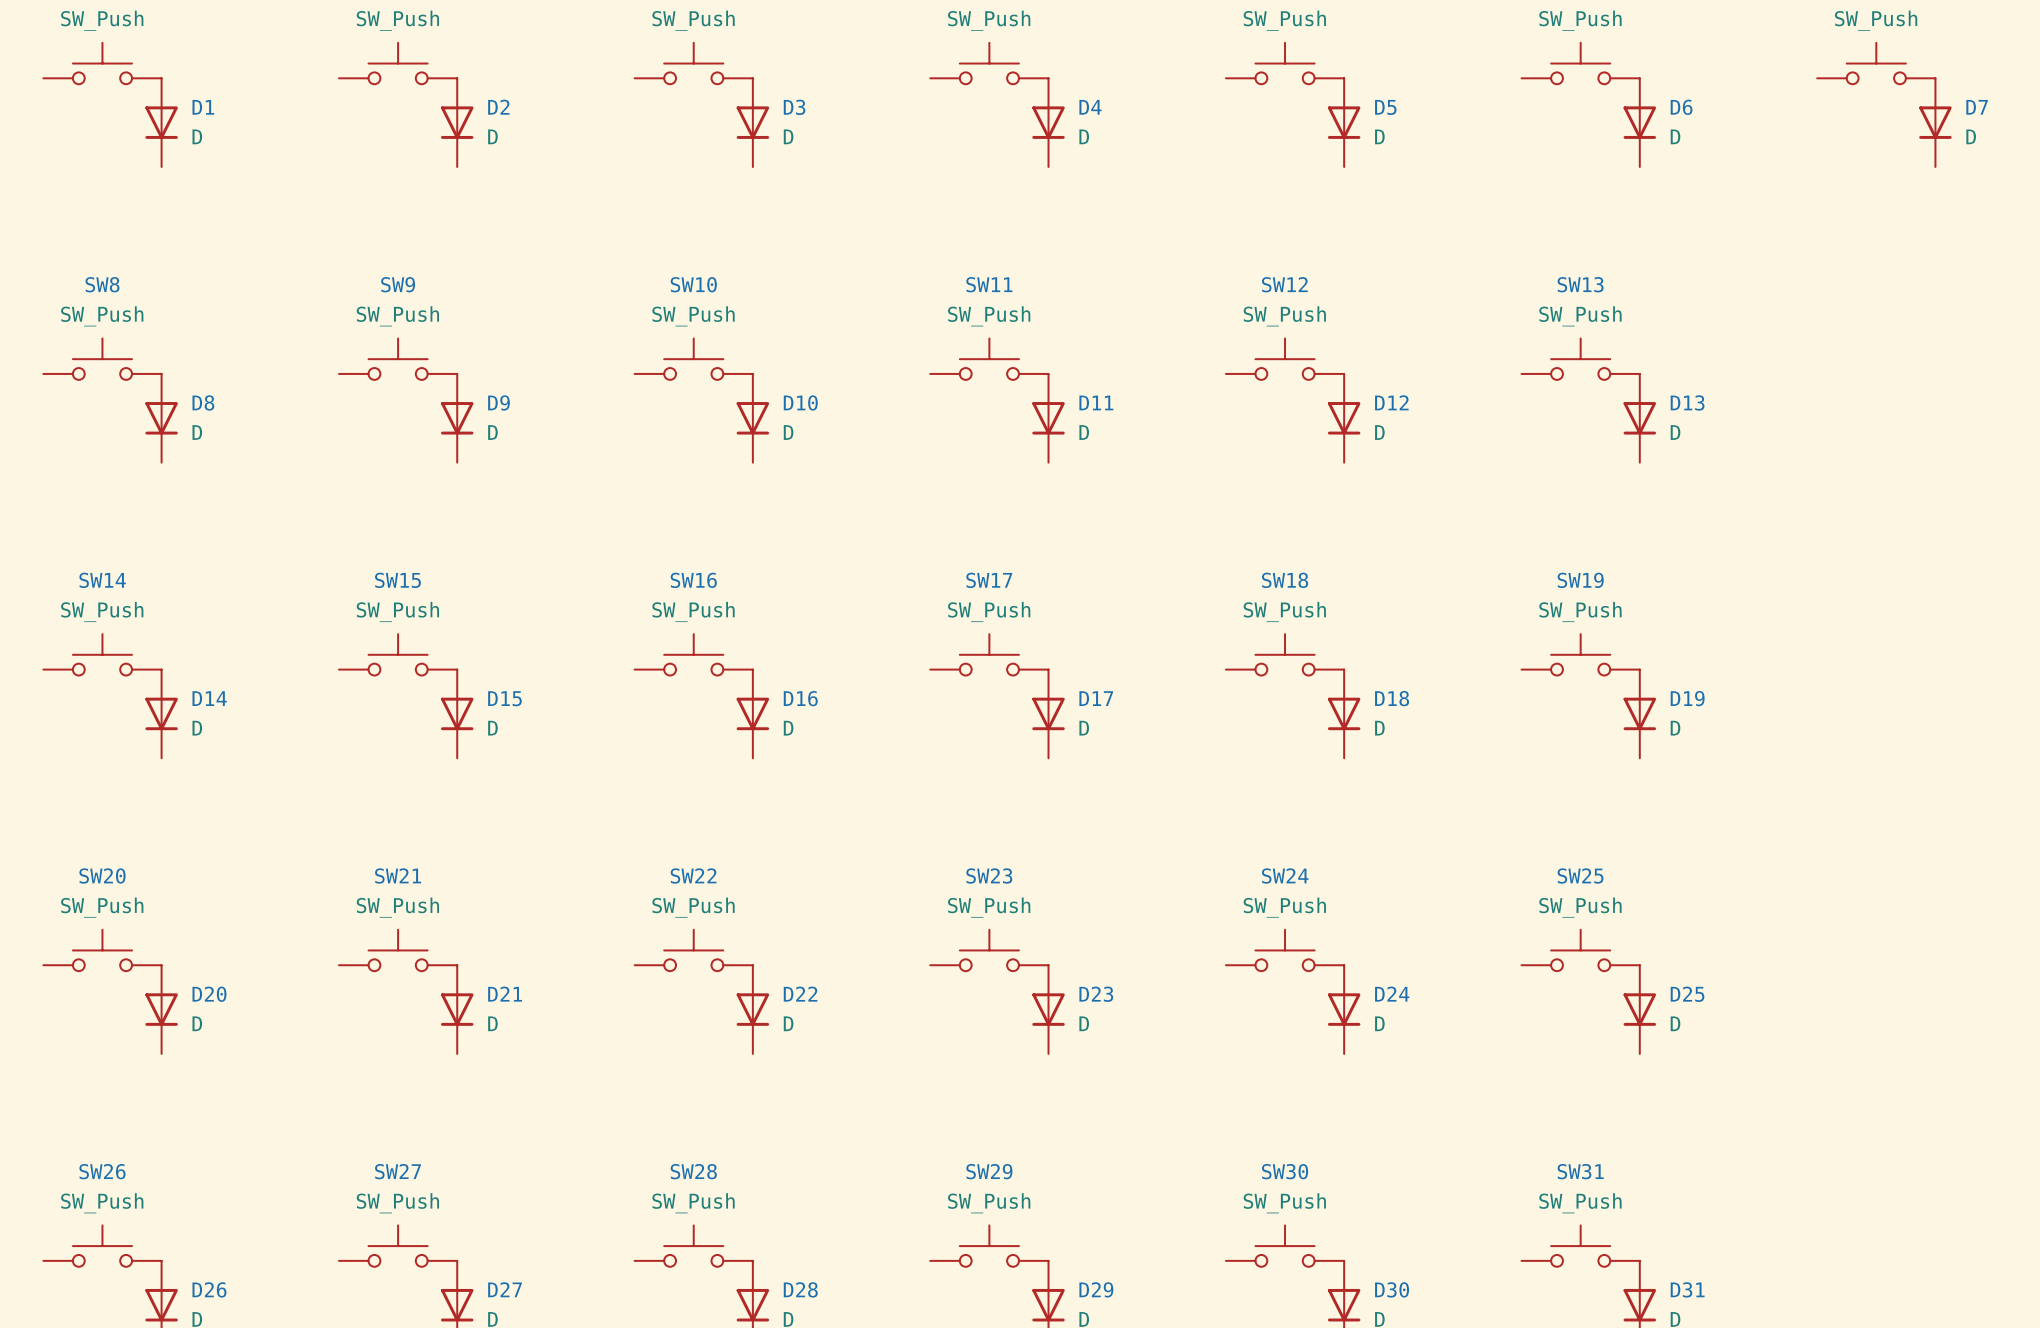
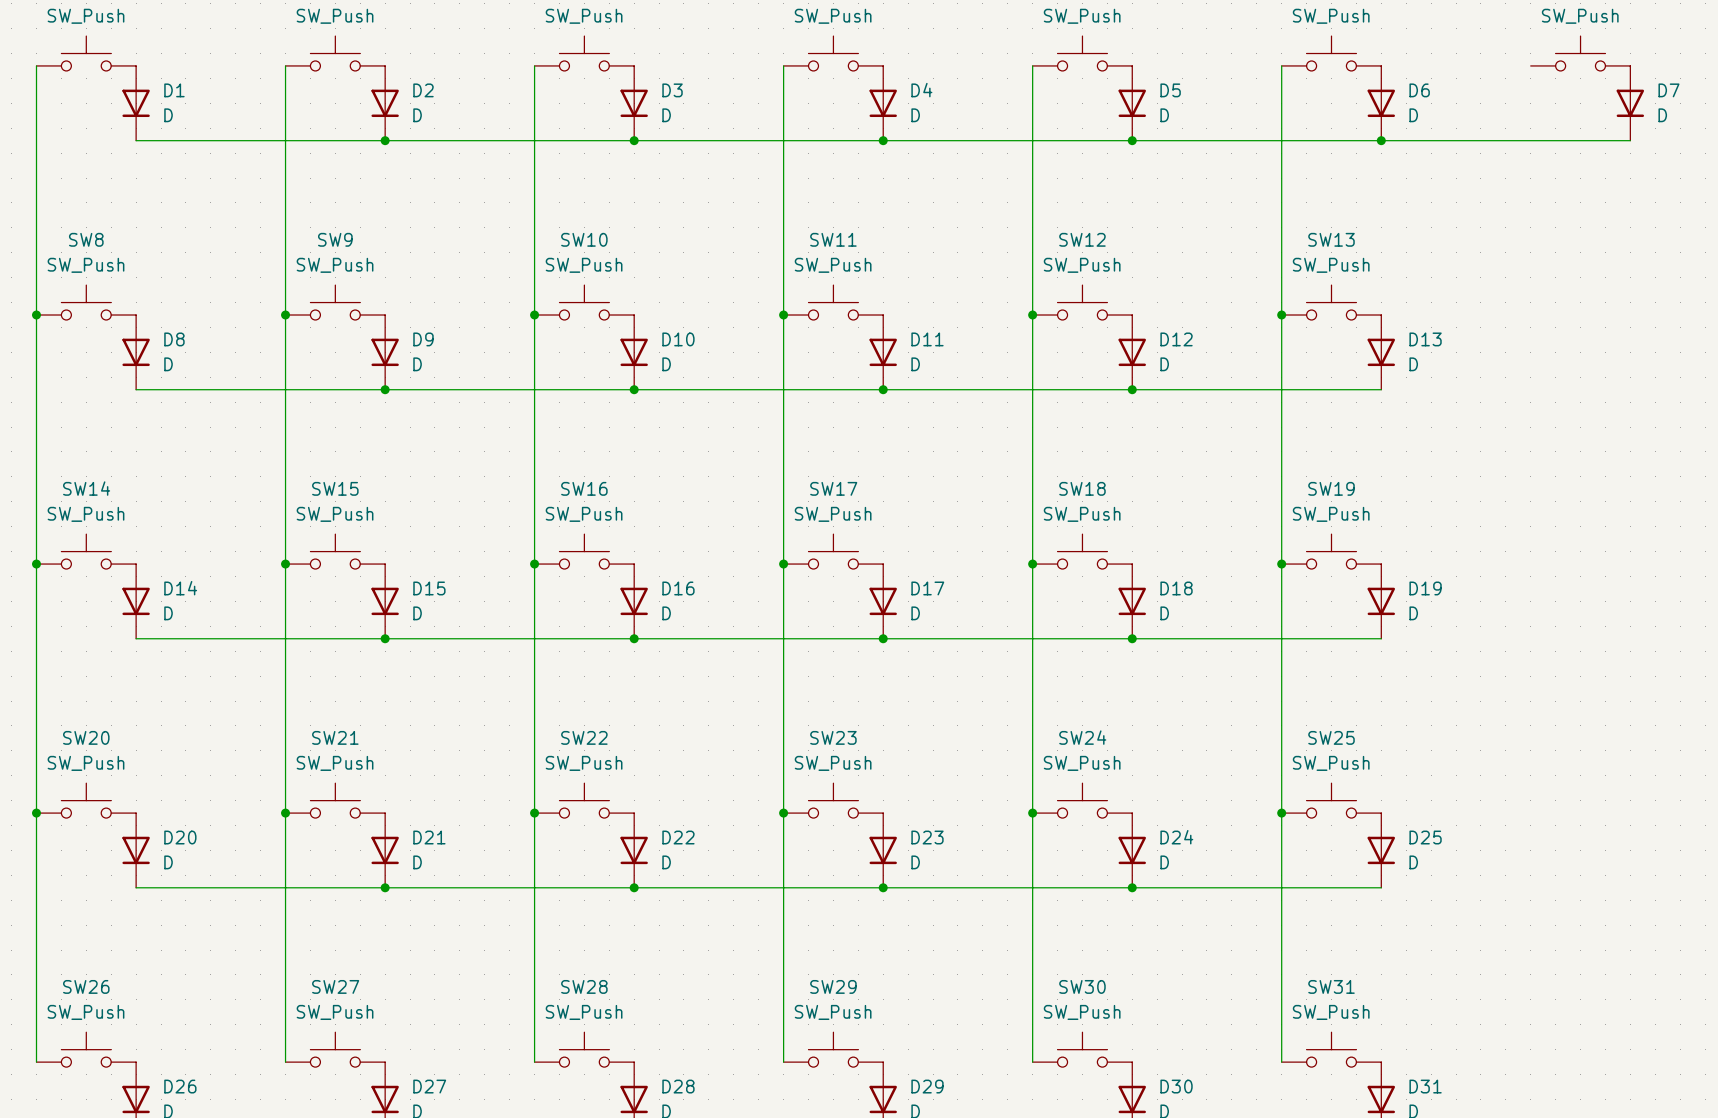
wire: none -> (36, 65) (36, 1062)
wire: none -> (285, 65) (285, 1062)
wire: none -> (534, 65) (534, 1062)
wire: none -> (783, 65) (783, 1062)
wire: none -> (1032, 65) (1032, 1062)
wire: none -> (1281, 65) (1281, 1062)
wire: none -> (136, 140) (1630, 140)
junction: none -> (385, 140)
junction: none -> (634, 140)
junction: none -> (883, 140)
junction: none -> (1132, 140)
junction: none -> (1381, 140)
junction: none -> (36, 315)
junction: none -> (285, 315)
junction: none -> (534, 315)
junction: none -> (783, 315)
junction: none -> (1032, 315)
junction: none -> (1281, 315)
wire: none -> (136, 389) (1381, 389)
junction: none -> (385, 389)
junction: none -> (634, 389)
junction: none -> (883, 389)
junction: none -> (1132, 389)
junction: none -> (36, 564)
junction: none -> (285, 564)
junction: none -> (534, 564)
junction: none -> (783, 564)
junction: none -> (1032, 564)
junction: none -> (1281, 564)
wire: none -> (136, 638) (1381, 638)
junction: none -> (385, 638)
junction: none -> (634, 638)
junction: none -> (883, 638)
junction: none -> (1132, 638)
junction: none -> (36, 813)
junction: none -> (285, 813)
junction: none -> (534, 813)
junction: none -> (783, 813)
junction: none -> (1032, 813)
junction: none -> (1281, 813)
wire: none -> (136, 887) (1381, 887)
junction: none -> (385, 887)
junction: none -> (634, 887)
junction: none -> (883, 887)
junction: none -> (1132, 887)

